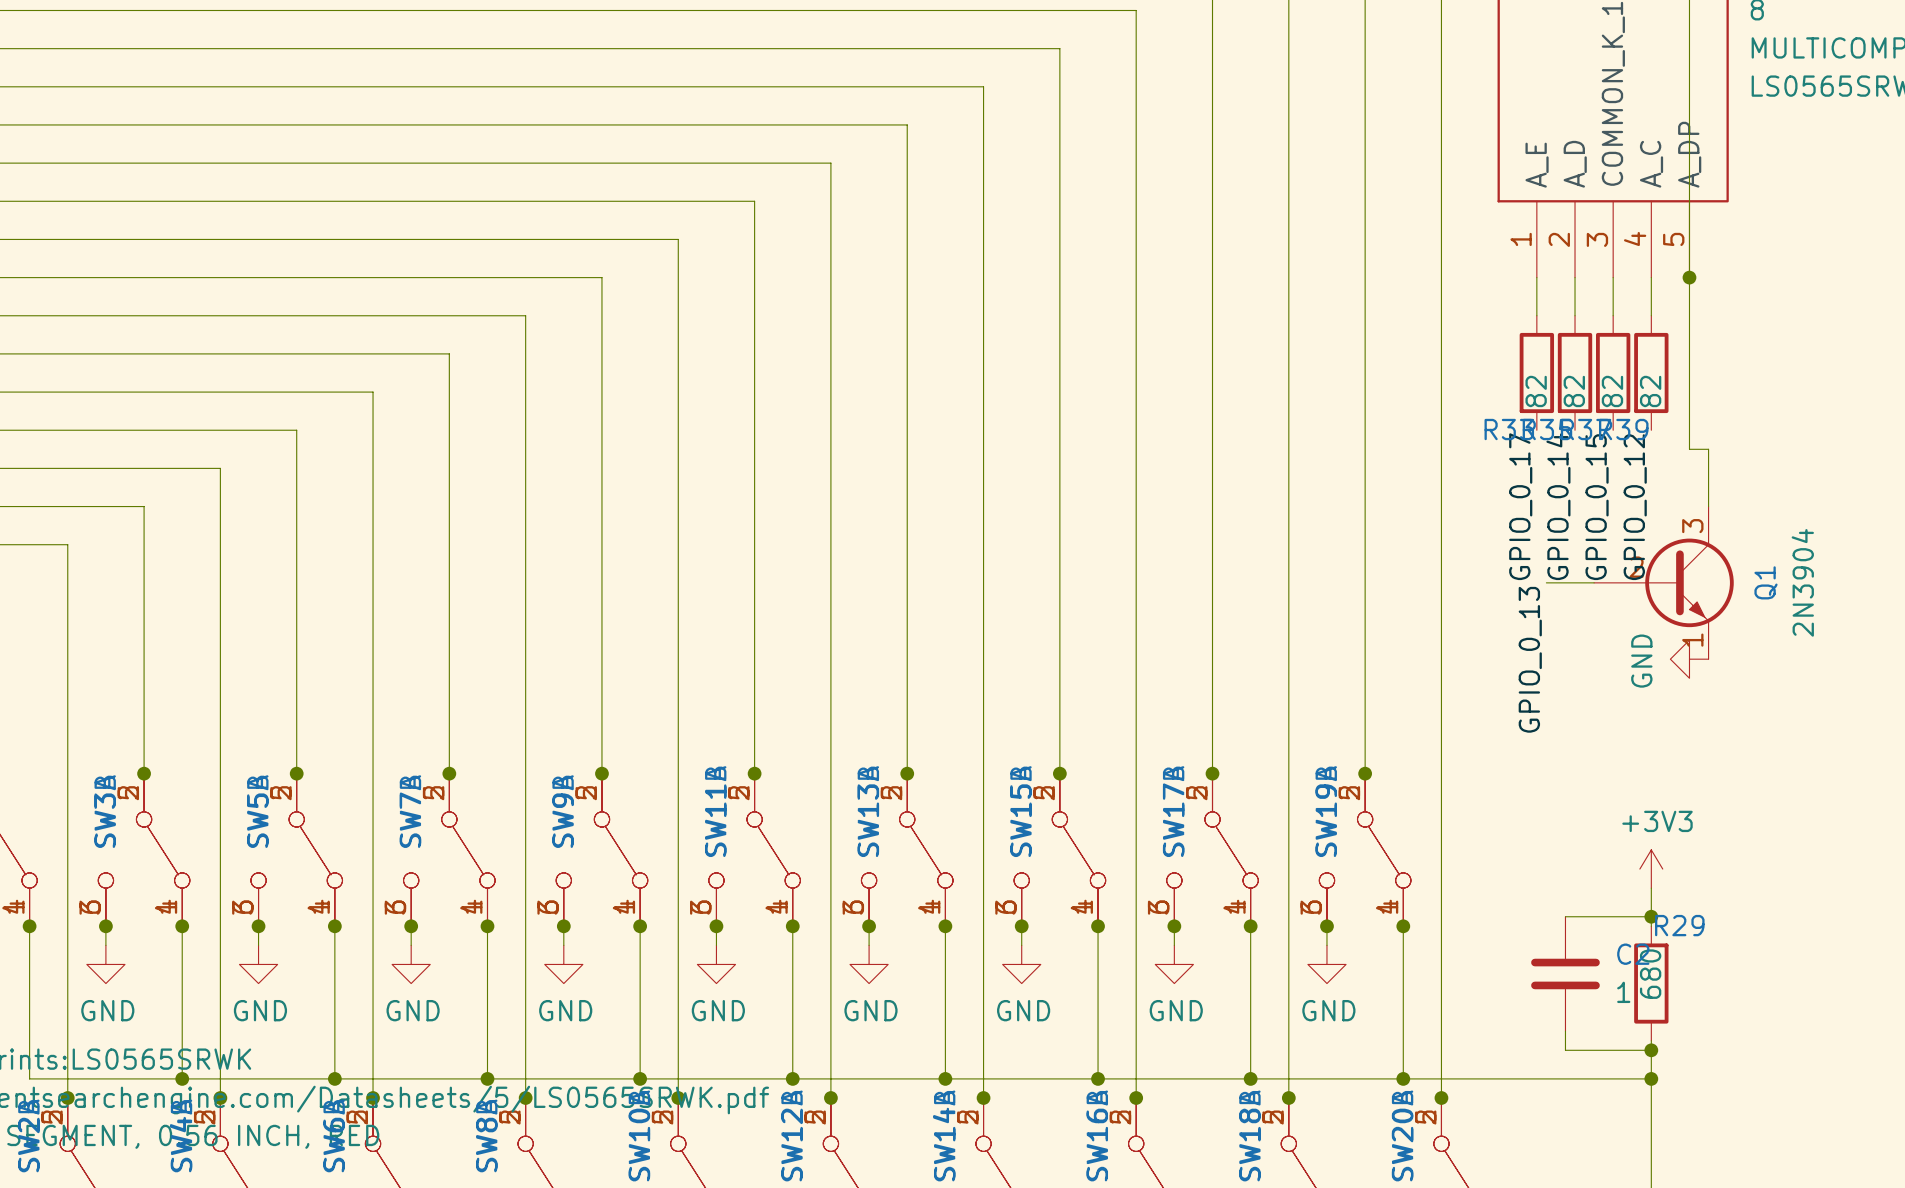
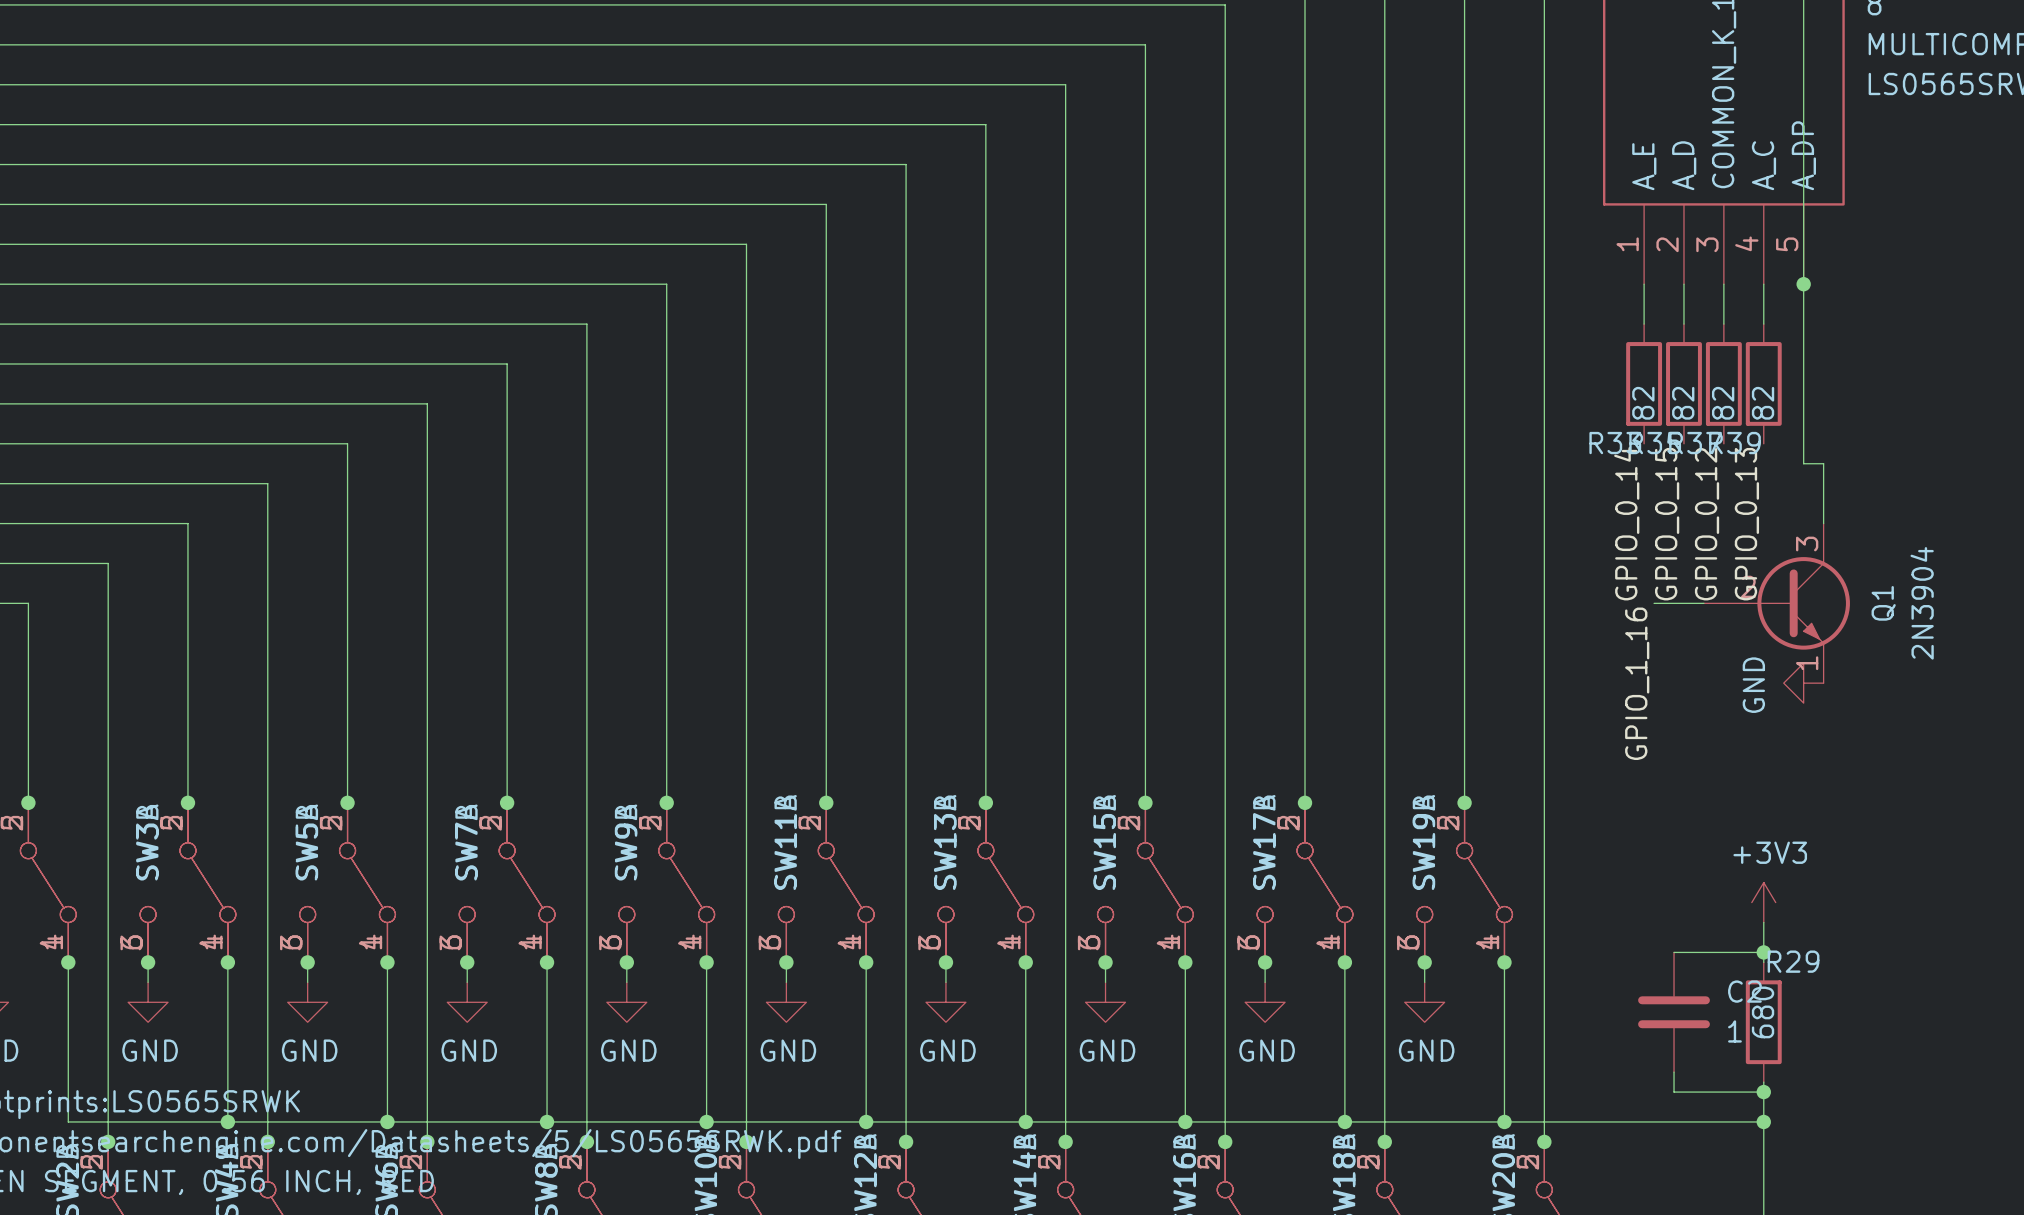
label: GPIO_0_17 (1520, 506) -> GPIO_0_14 (1626, 523)
label: GPIO_0_14 (1558, 506) -> GPIO_0_15 (1667, 524)
label: GPIO_0_15 (1597, 507) -> GPIO_0_12 (1707, 524)
label: GPIO_0_12 (1635, 507) -> GPIO_0_13 (1746, 524)
label: GPIO_0_13 (1530, 659) -> GPIO_1_16 (1637, 683)

